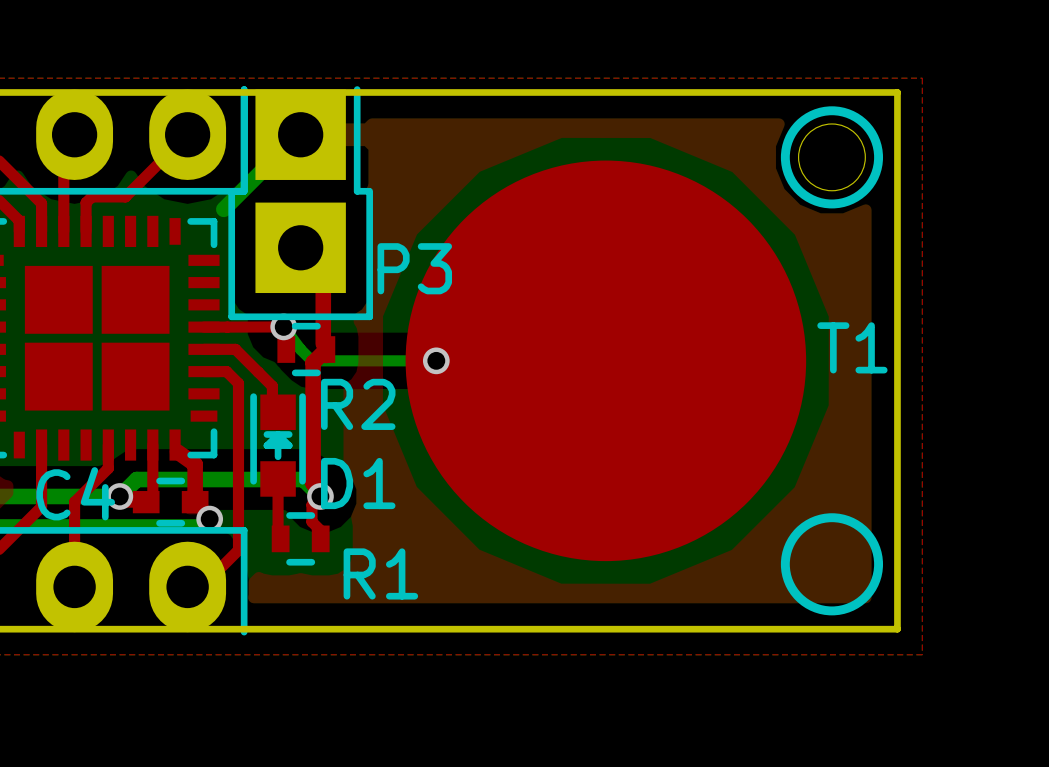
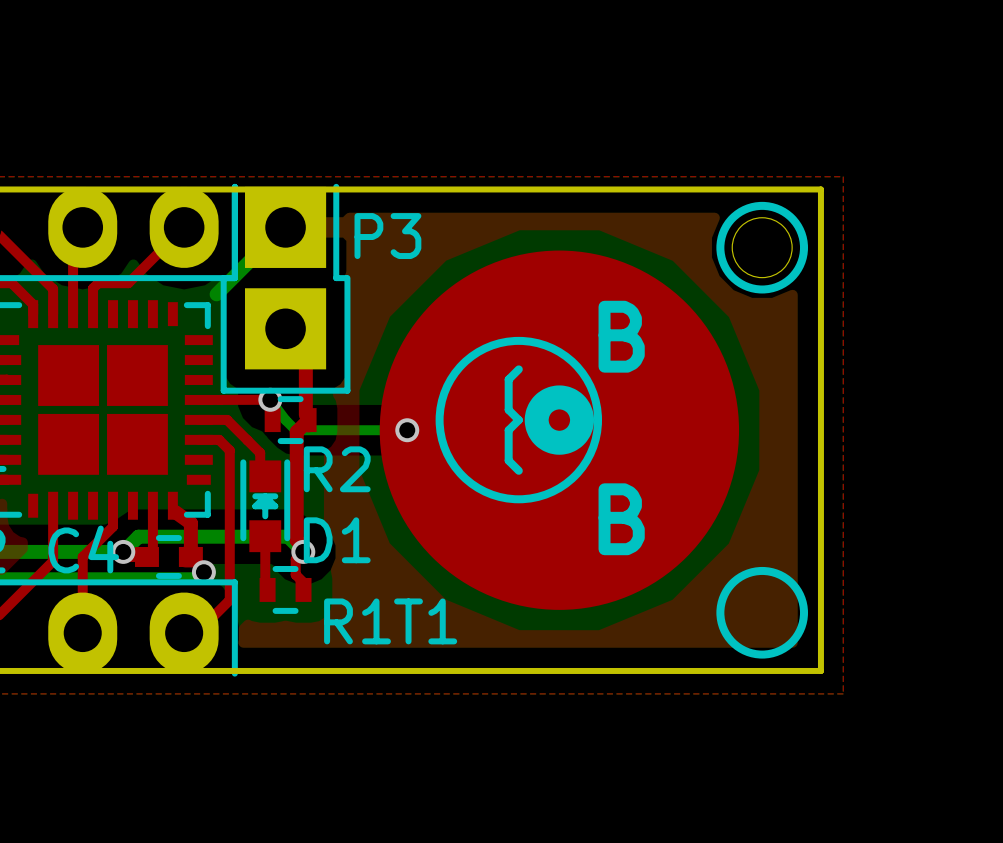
drawing: none -> [435, 336, 603, 504]
text: none -> B (621, 336)
P3 name position: P3 (414, 268) -> P3 (387, 236)
line: none -> (518, 369) (508, 379) (508, 409) (518, 420) (508, 430) (508, 460) (518, 470)
T1 name position: T1 (852, 347) -> T1 (425, 621)
text: none -> B (621, 519)

